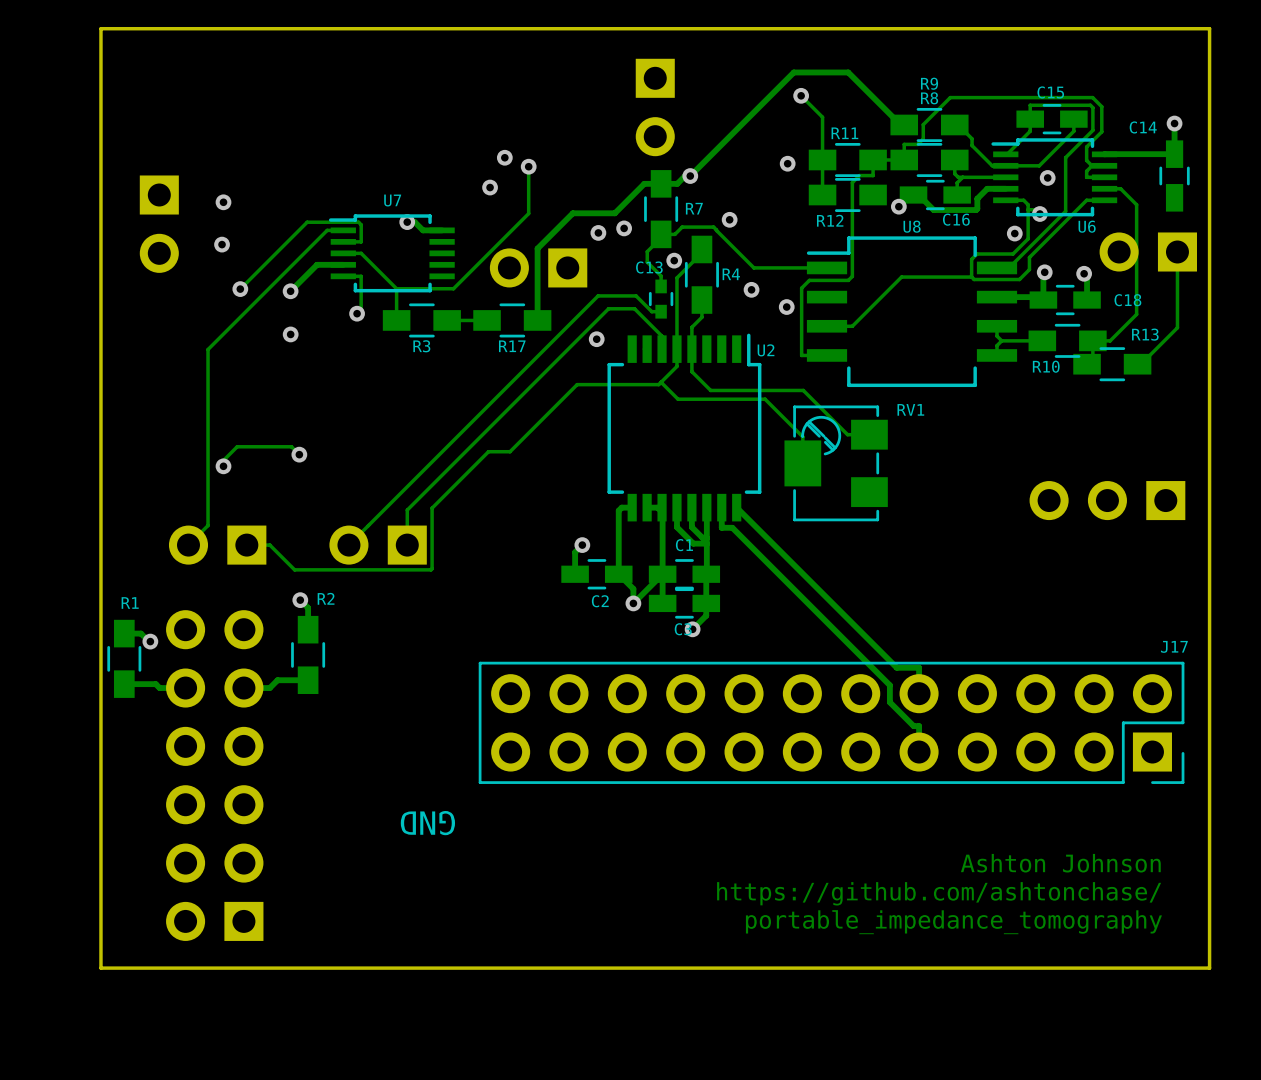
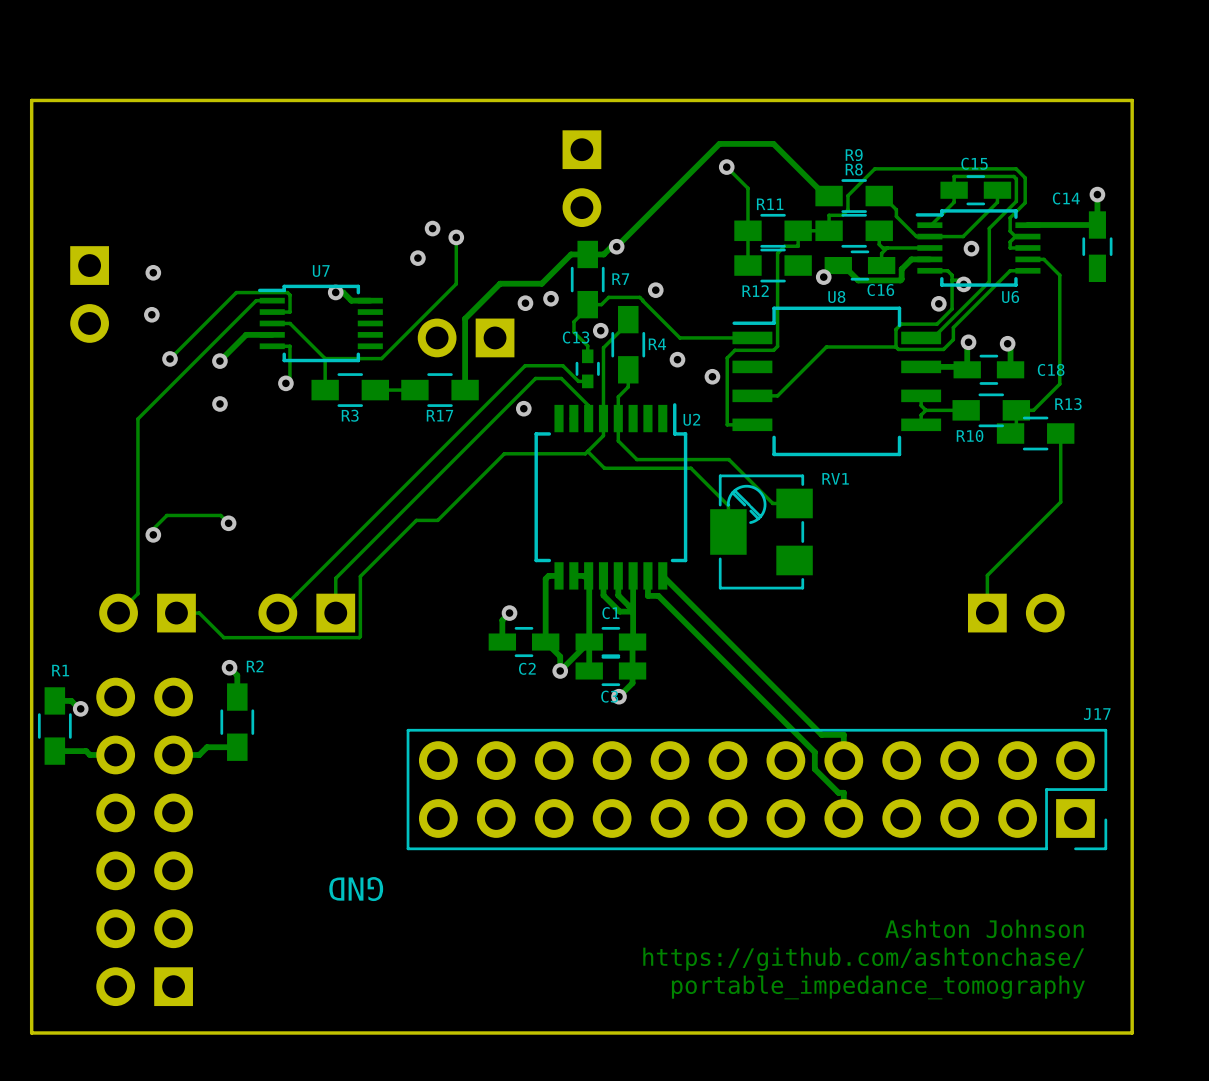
via: (787, 163) -> none
part rotation: 0° (1148, 251) -> 180° (1016, 613)
part position: (1148, 251) -> (1016, 613)
track: (1177, 251) (1177, 327) (1141, 364) (1137, 364) -> (987, 613) (987, 575) (1060, 502) (1060, 433)
part: (1107, 500) -> none

